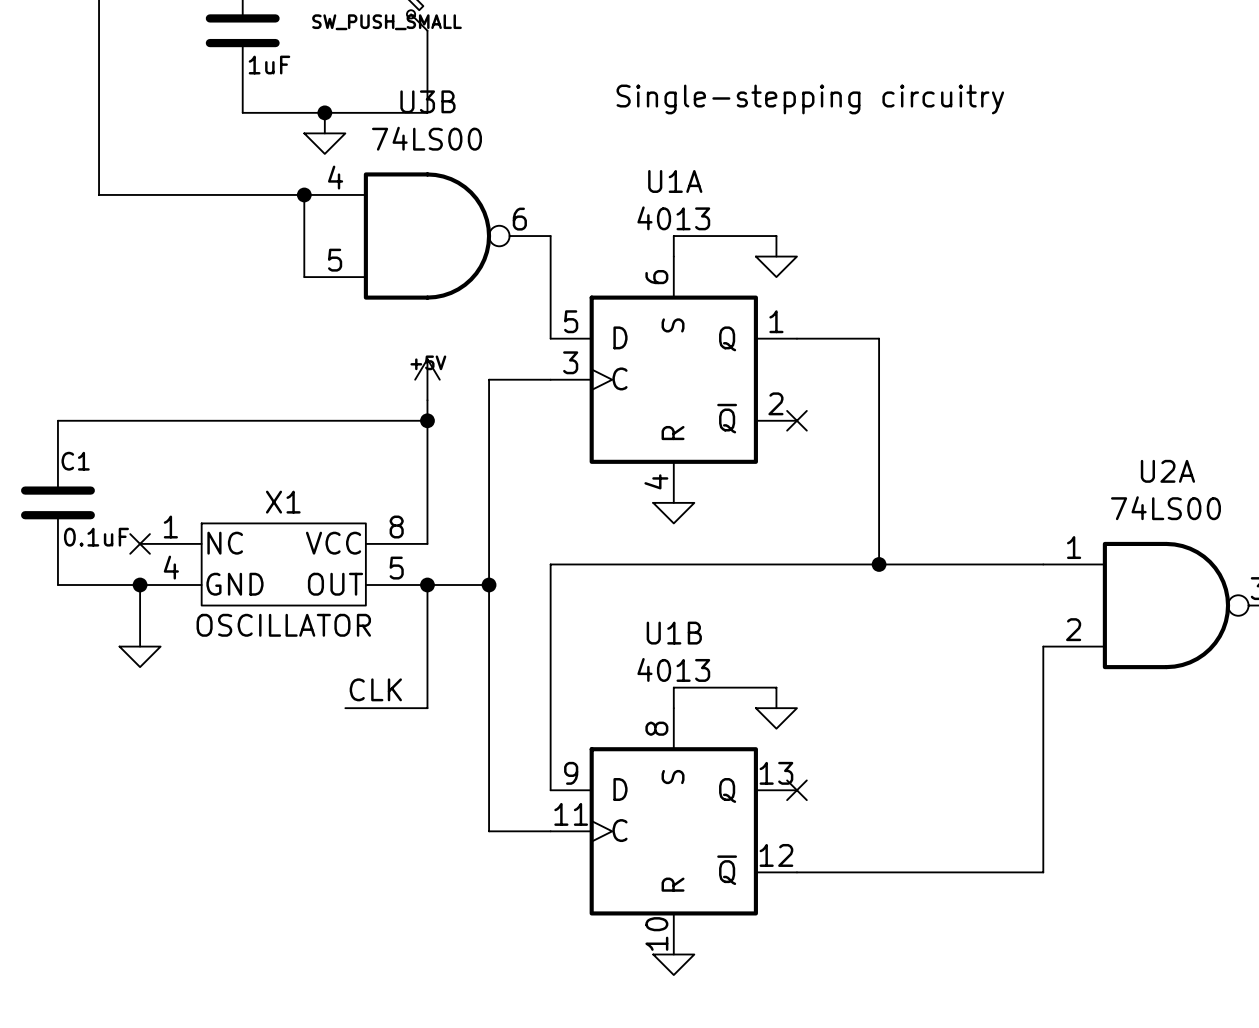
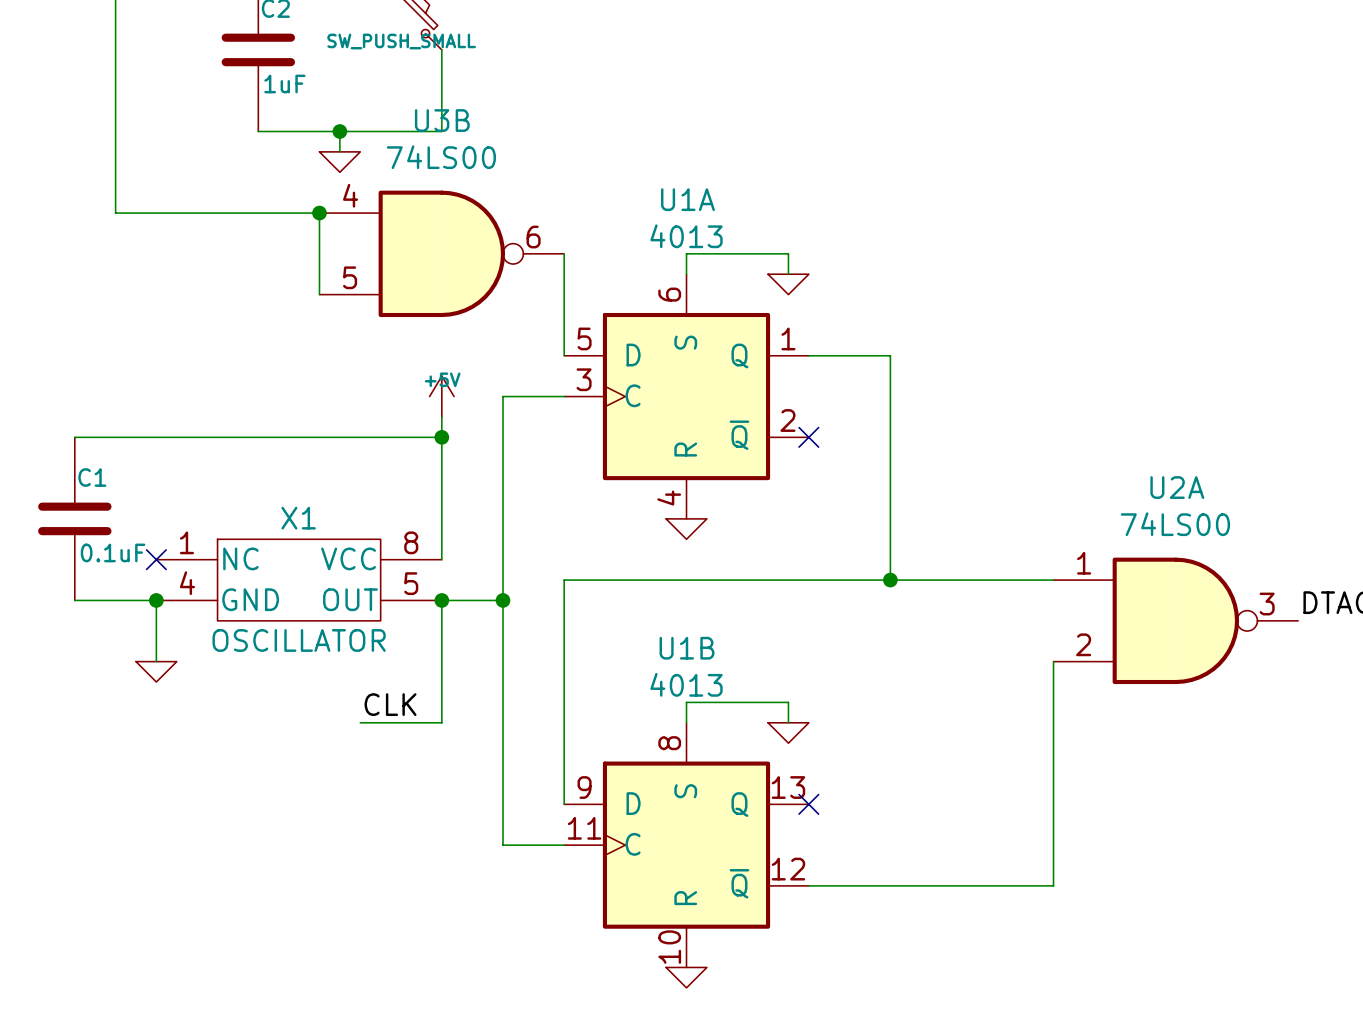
text: Single-stepping circuitry (810, 99) -> none

